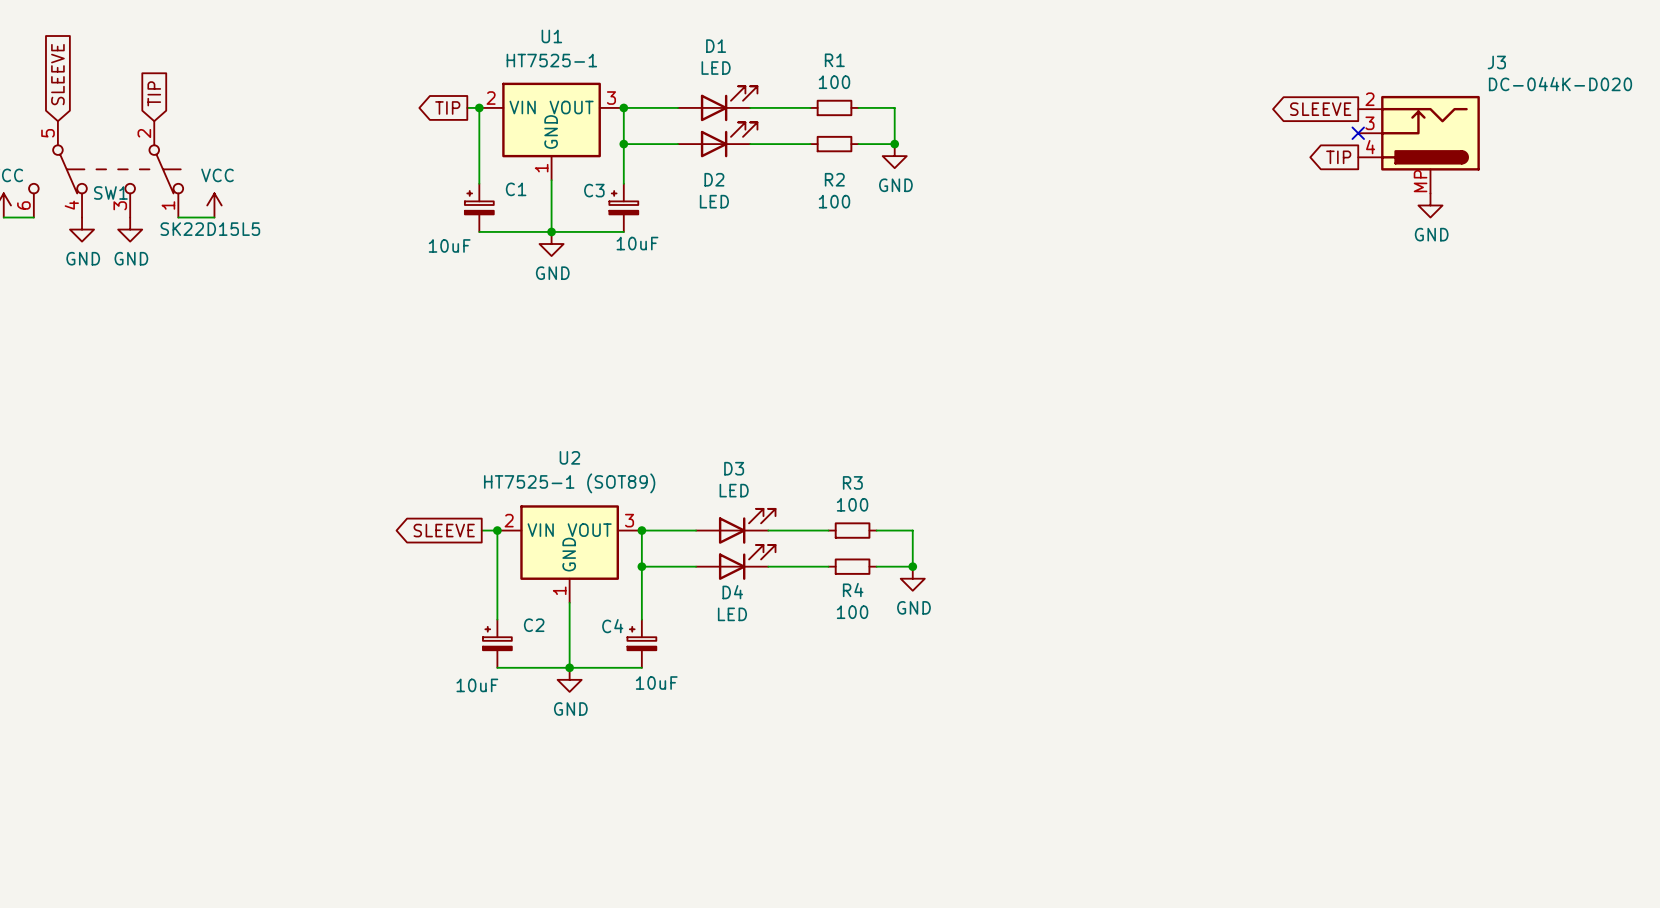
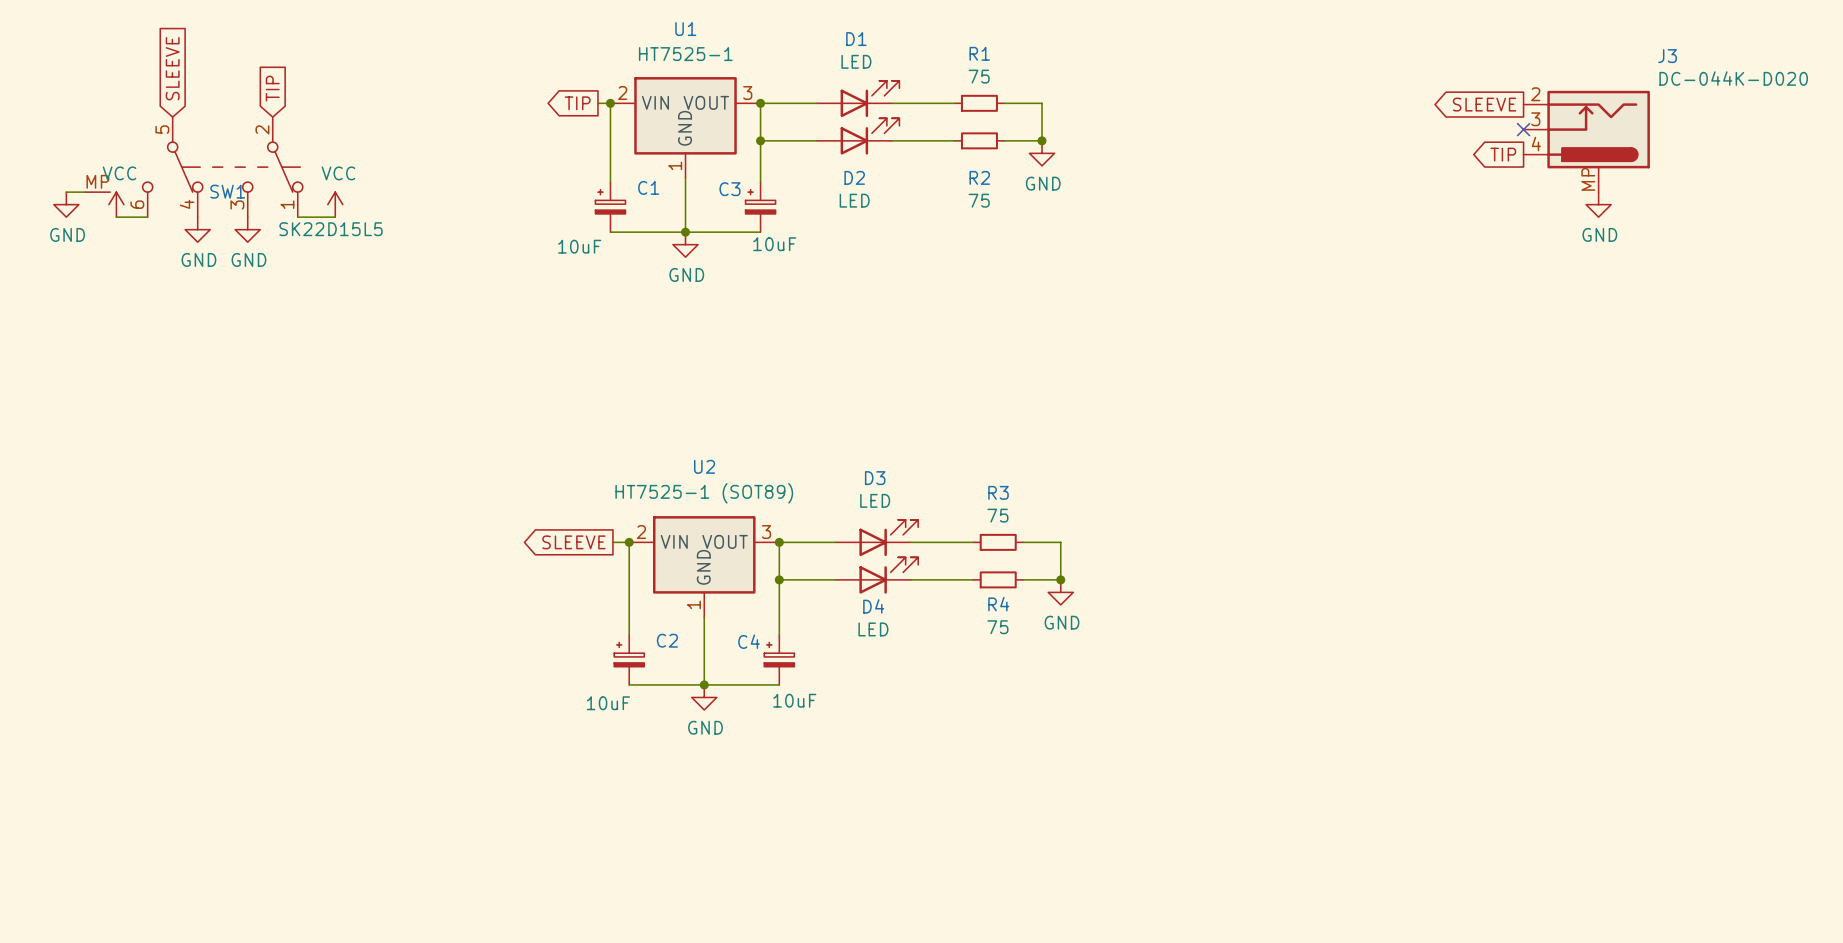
R1 value: 100 (834, 82) -> 75 (979, 76)
R2 value: 100 (834, 201) -> 75 (979, 200)
R3 value: 100 (852, 504) -> 75 (997, 515)
R4 value: 100 (852, 612) -> 75 (997, 627)

